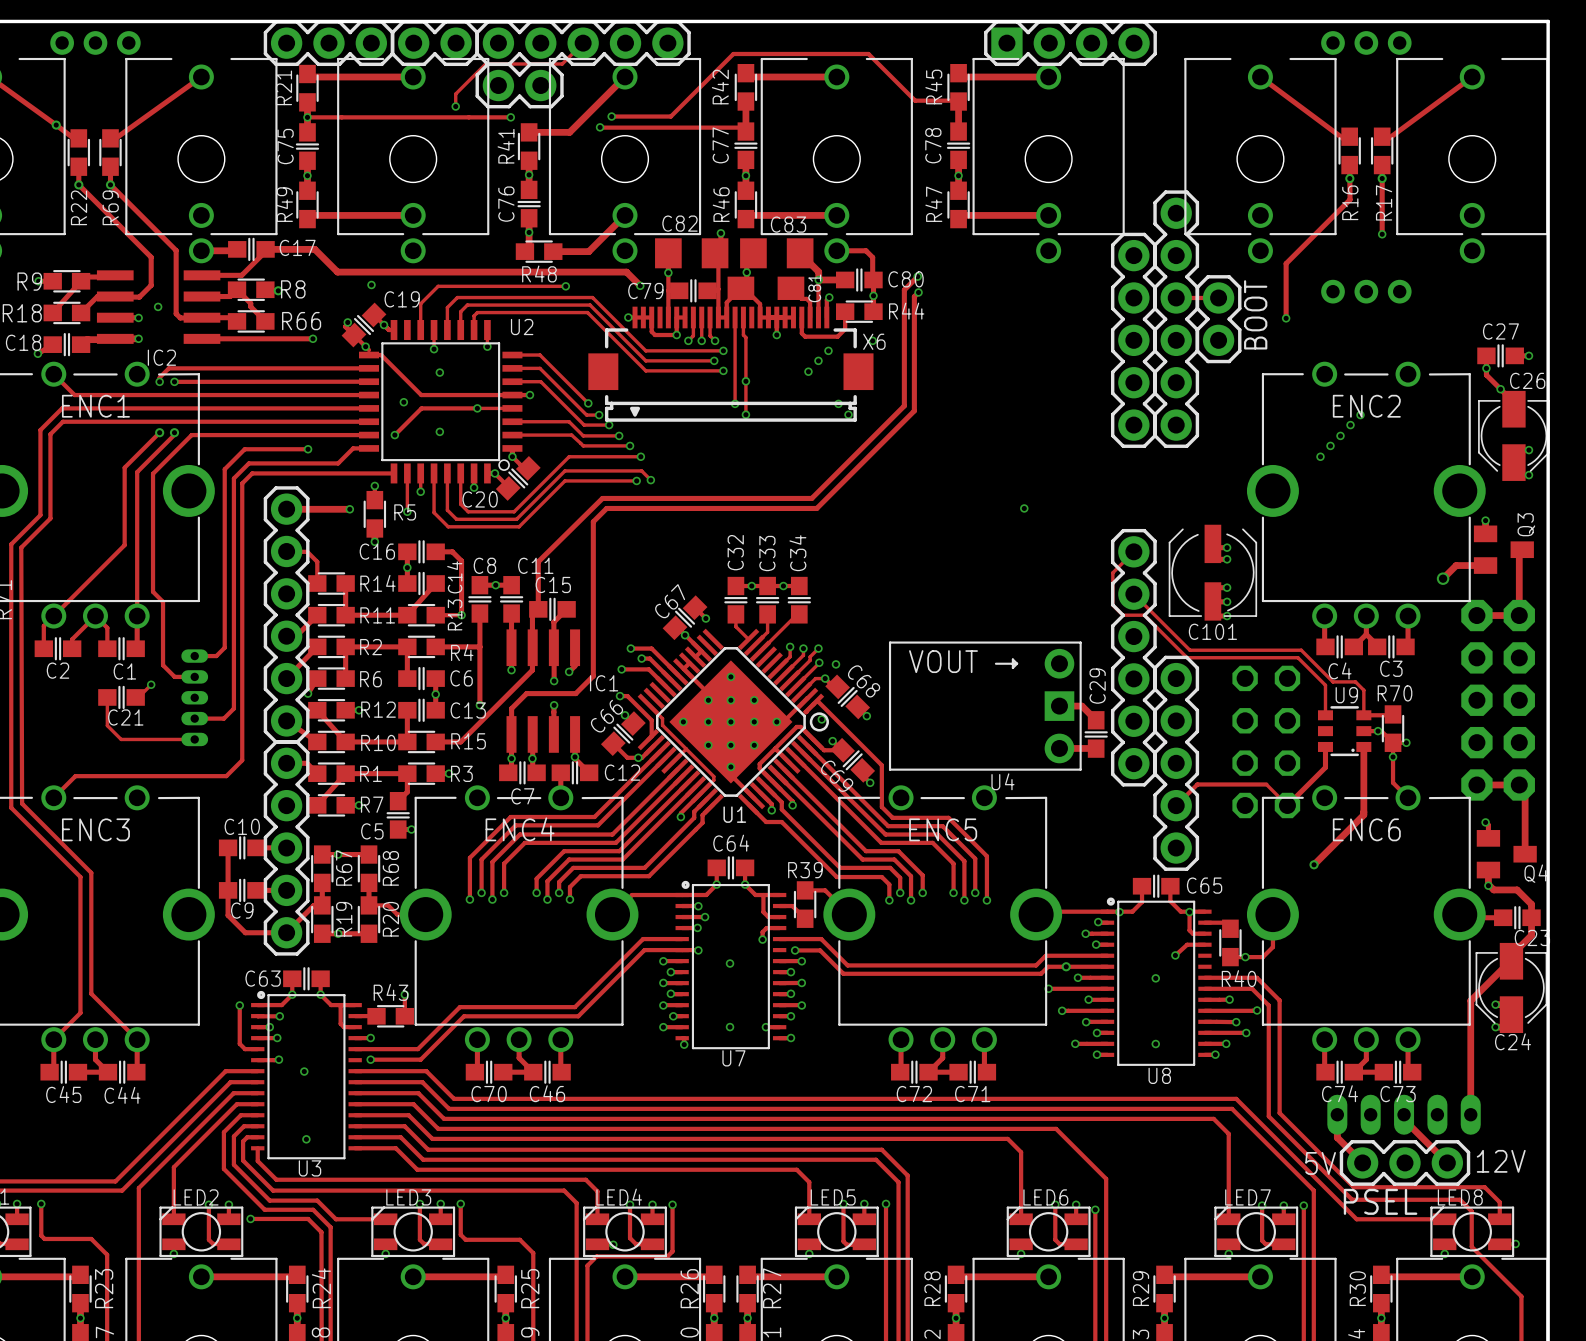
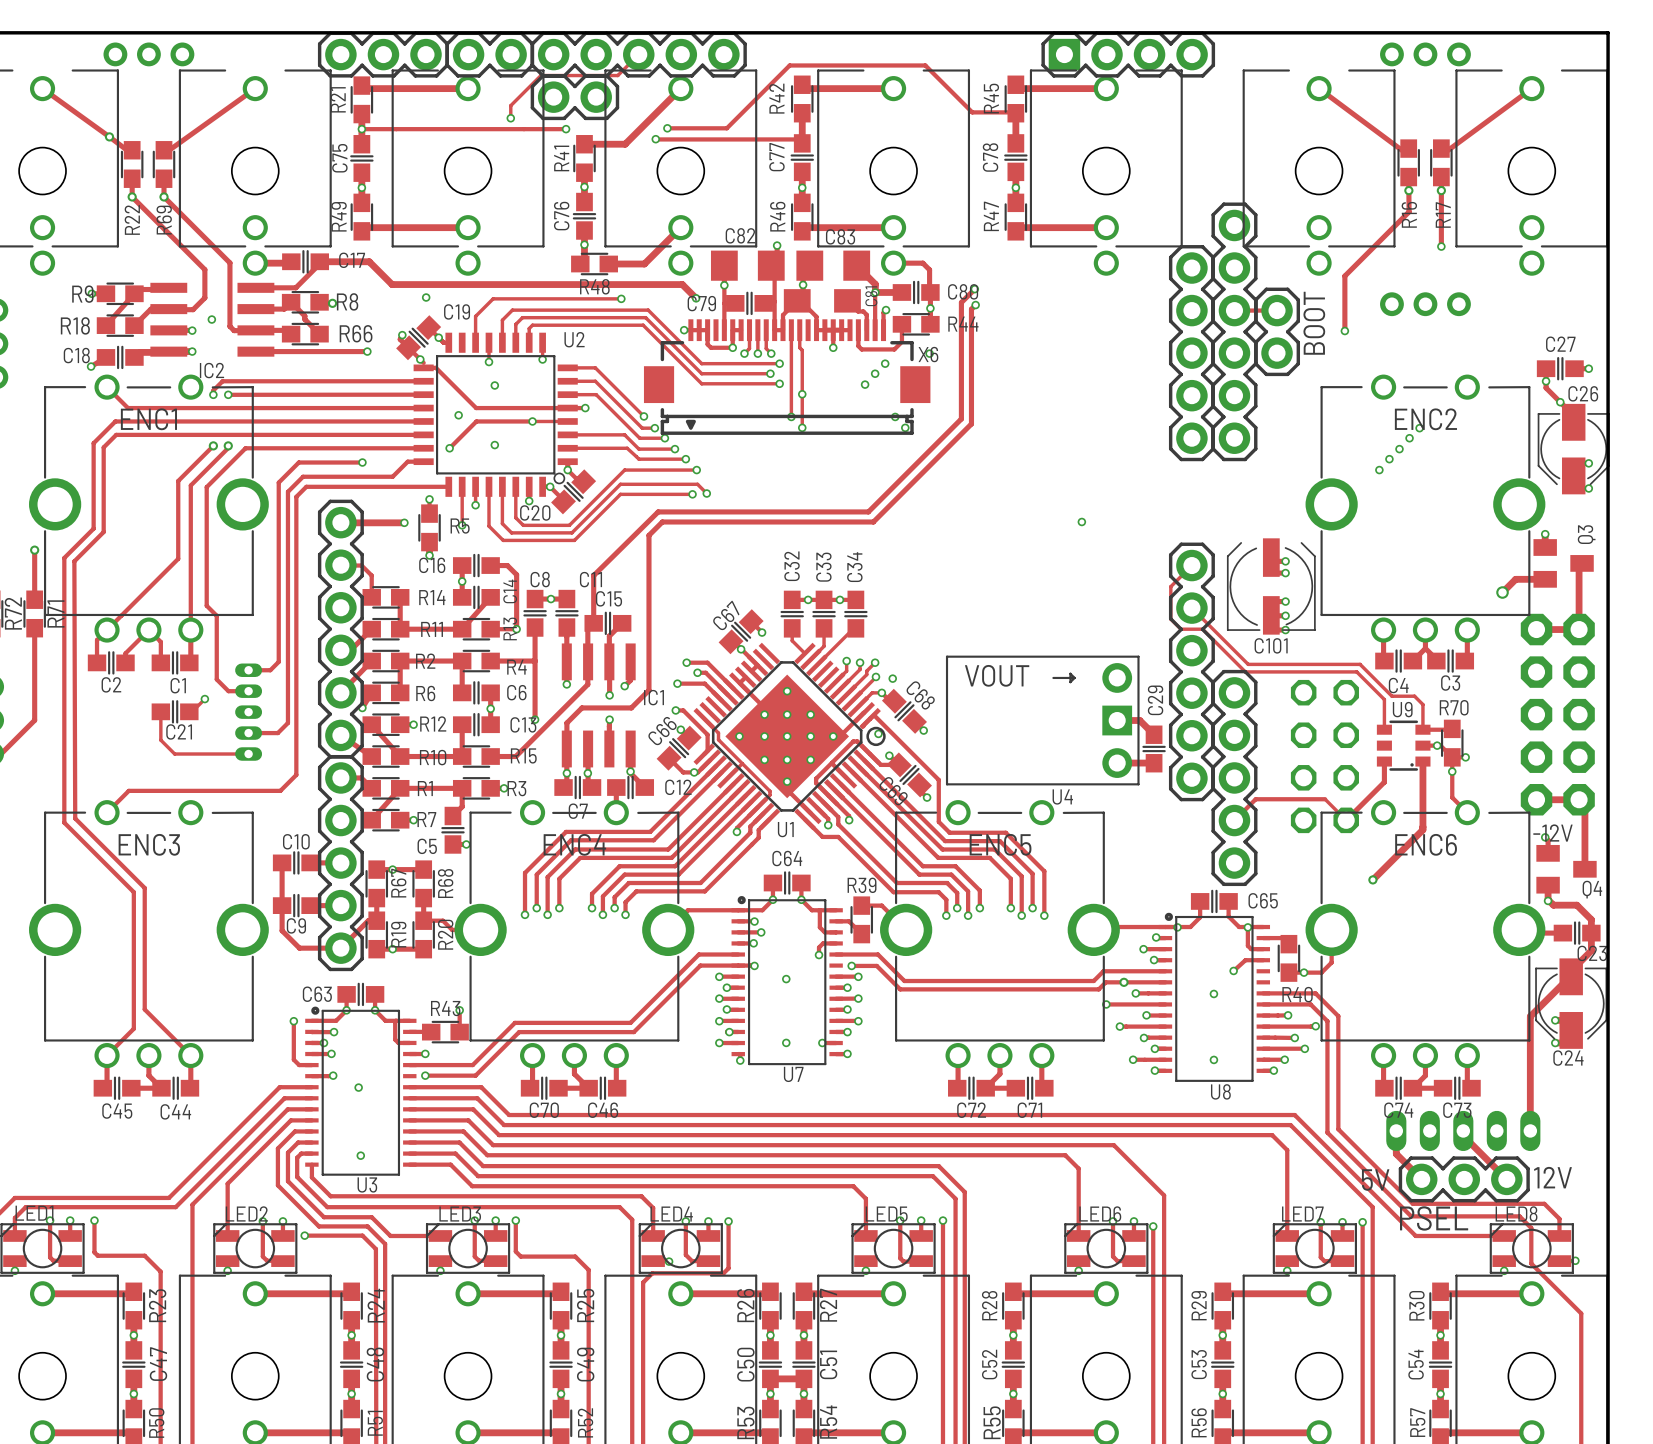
text: none -> -12V (1552, 833)

